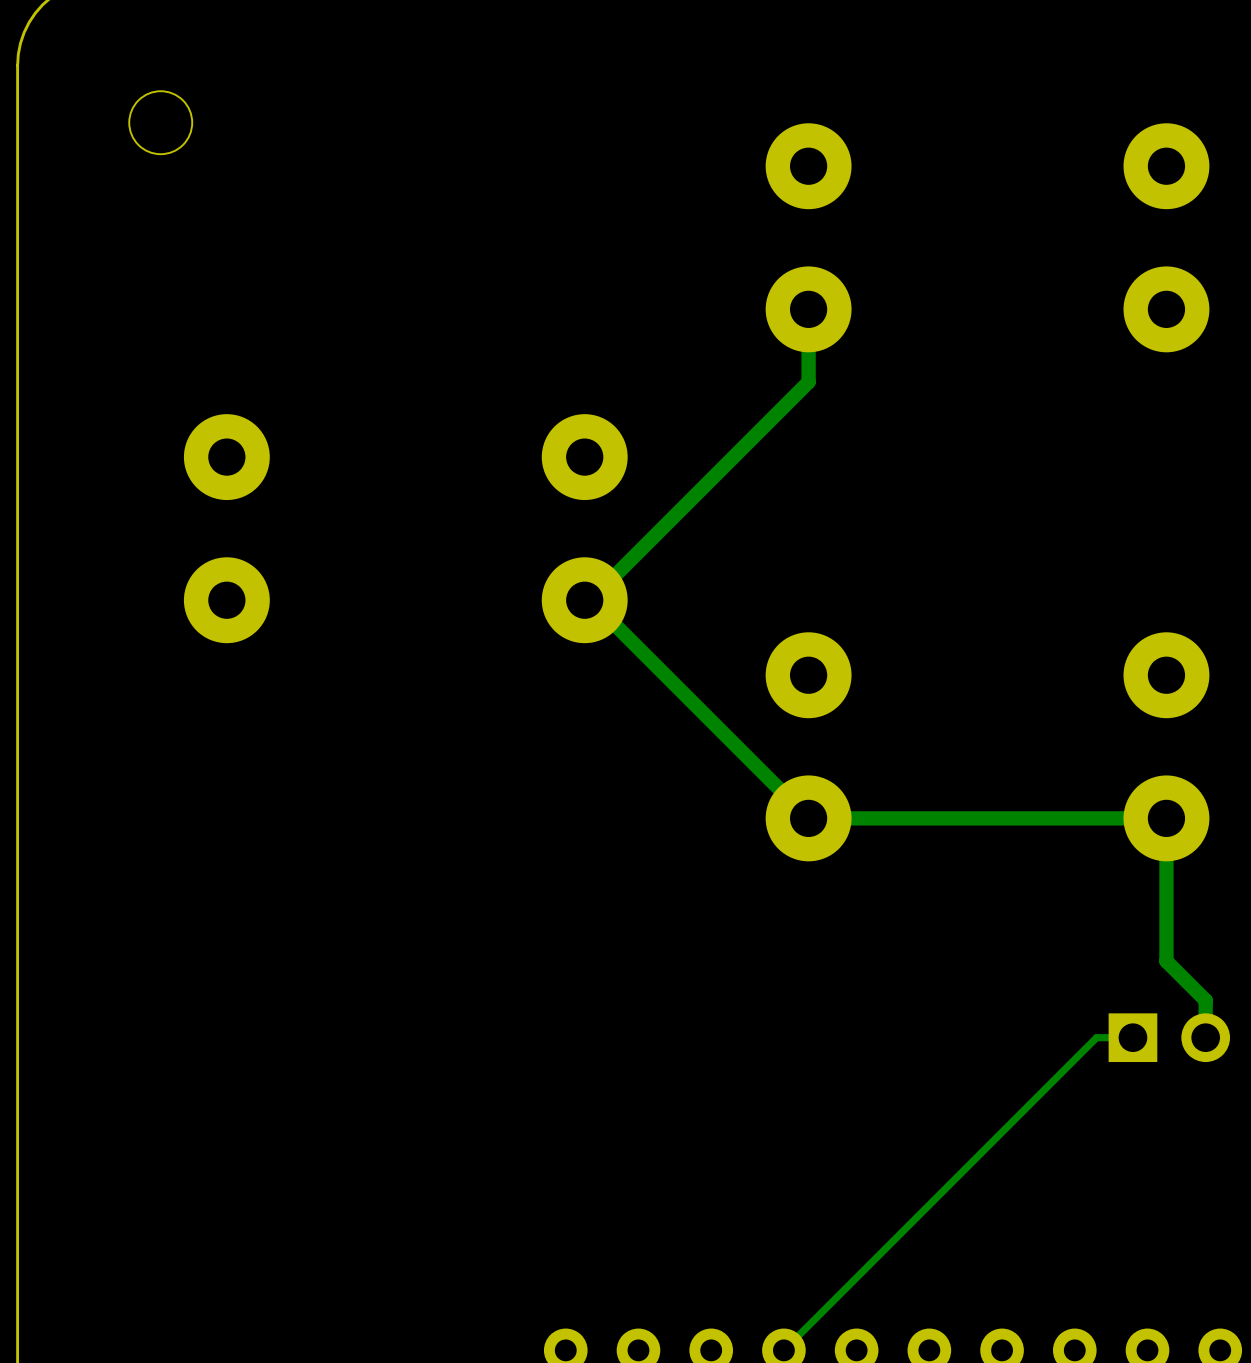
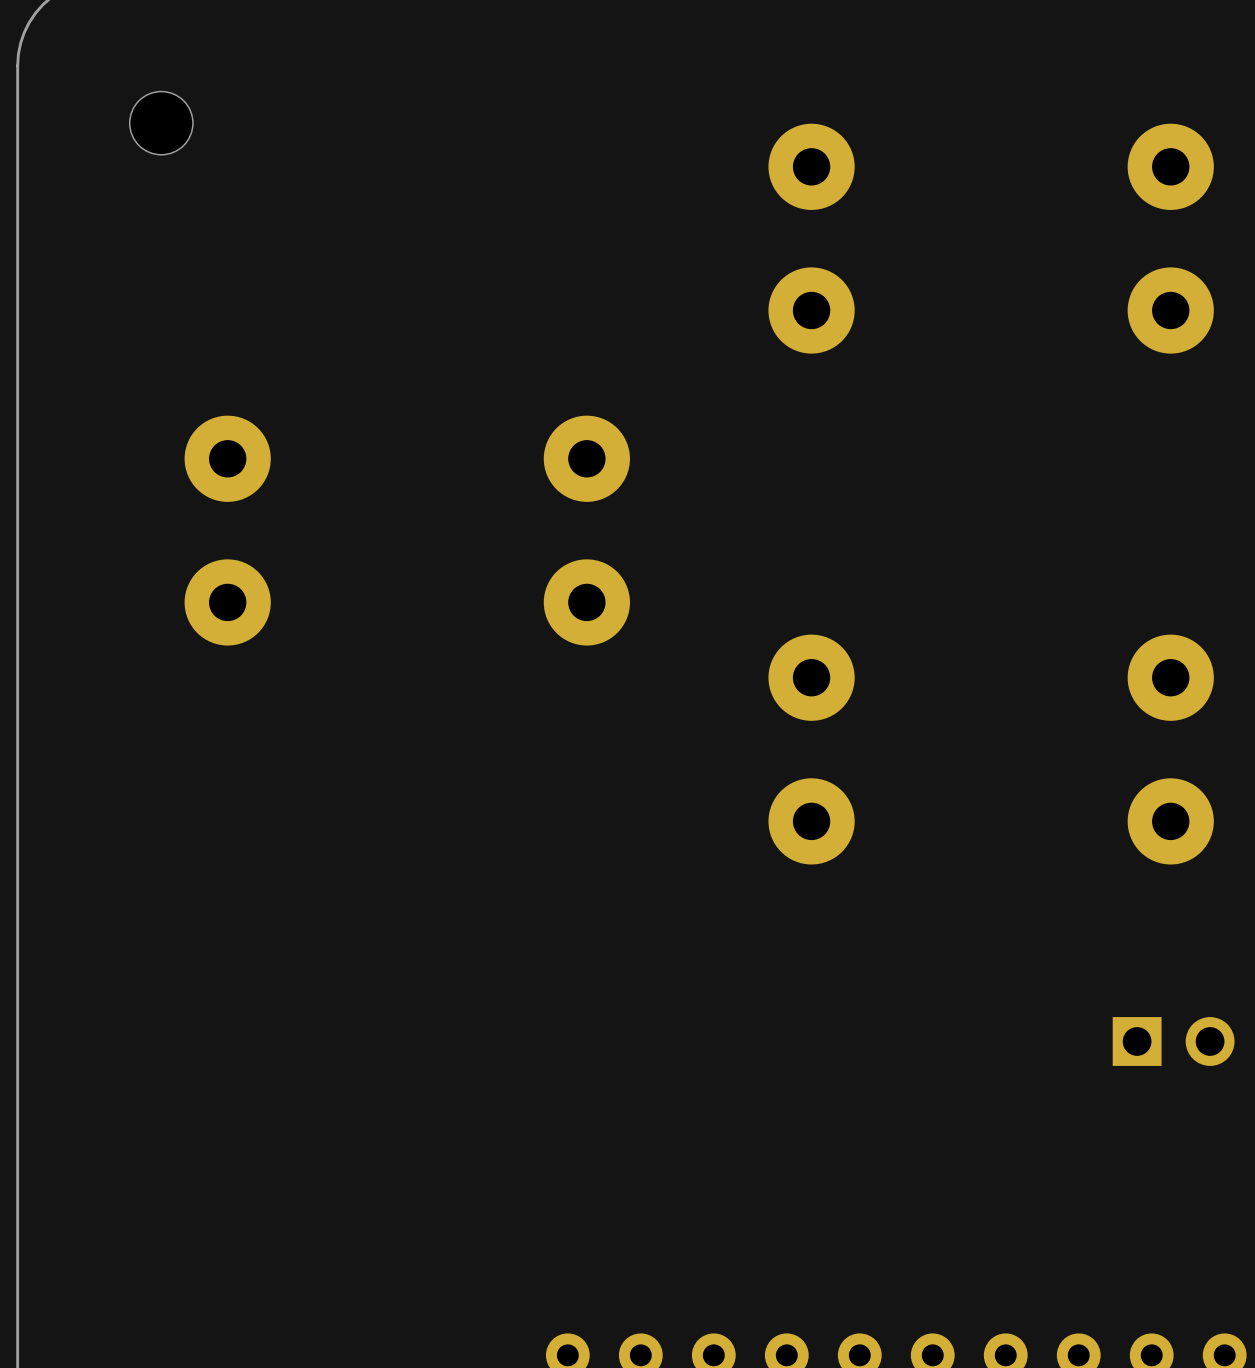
track: (808, 309) (808, 382) (590, 600) -> none
track: (590, 600) (808, 818) (1166, 818) (1166, 961) (1205, 1000) (1205, 1037) -> none
track: (1132, 1037) (1096, 1037) (783, 1350) -> none

